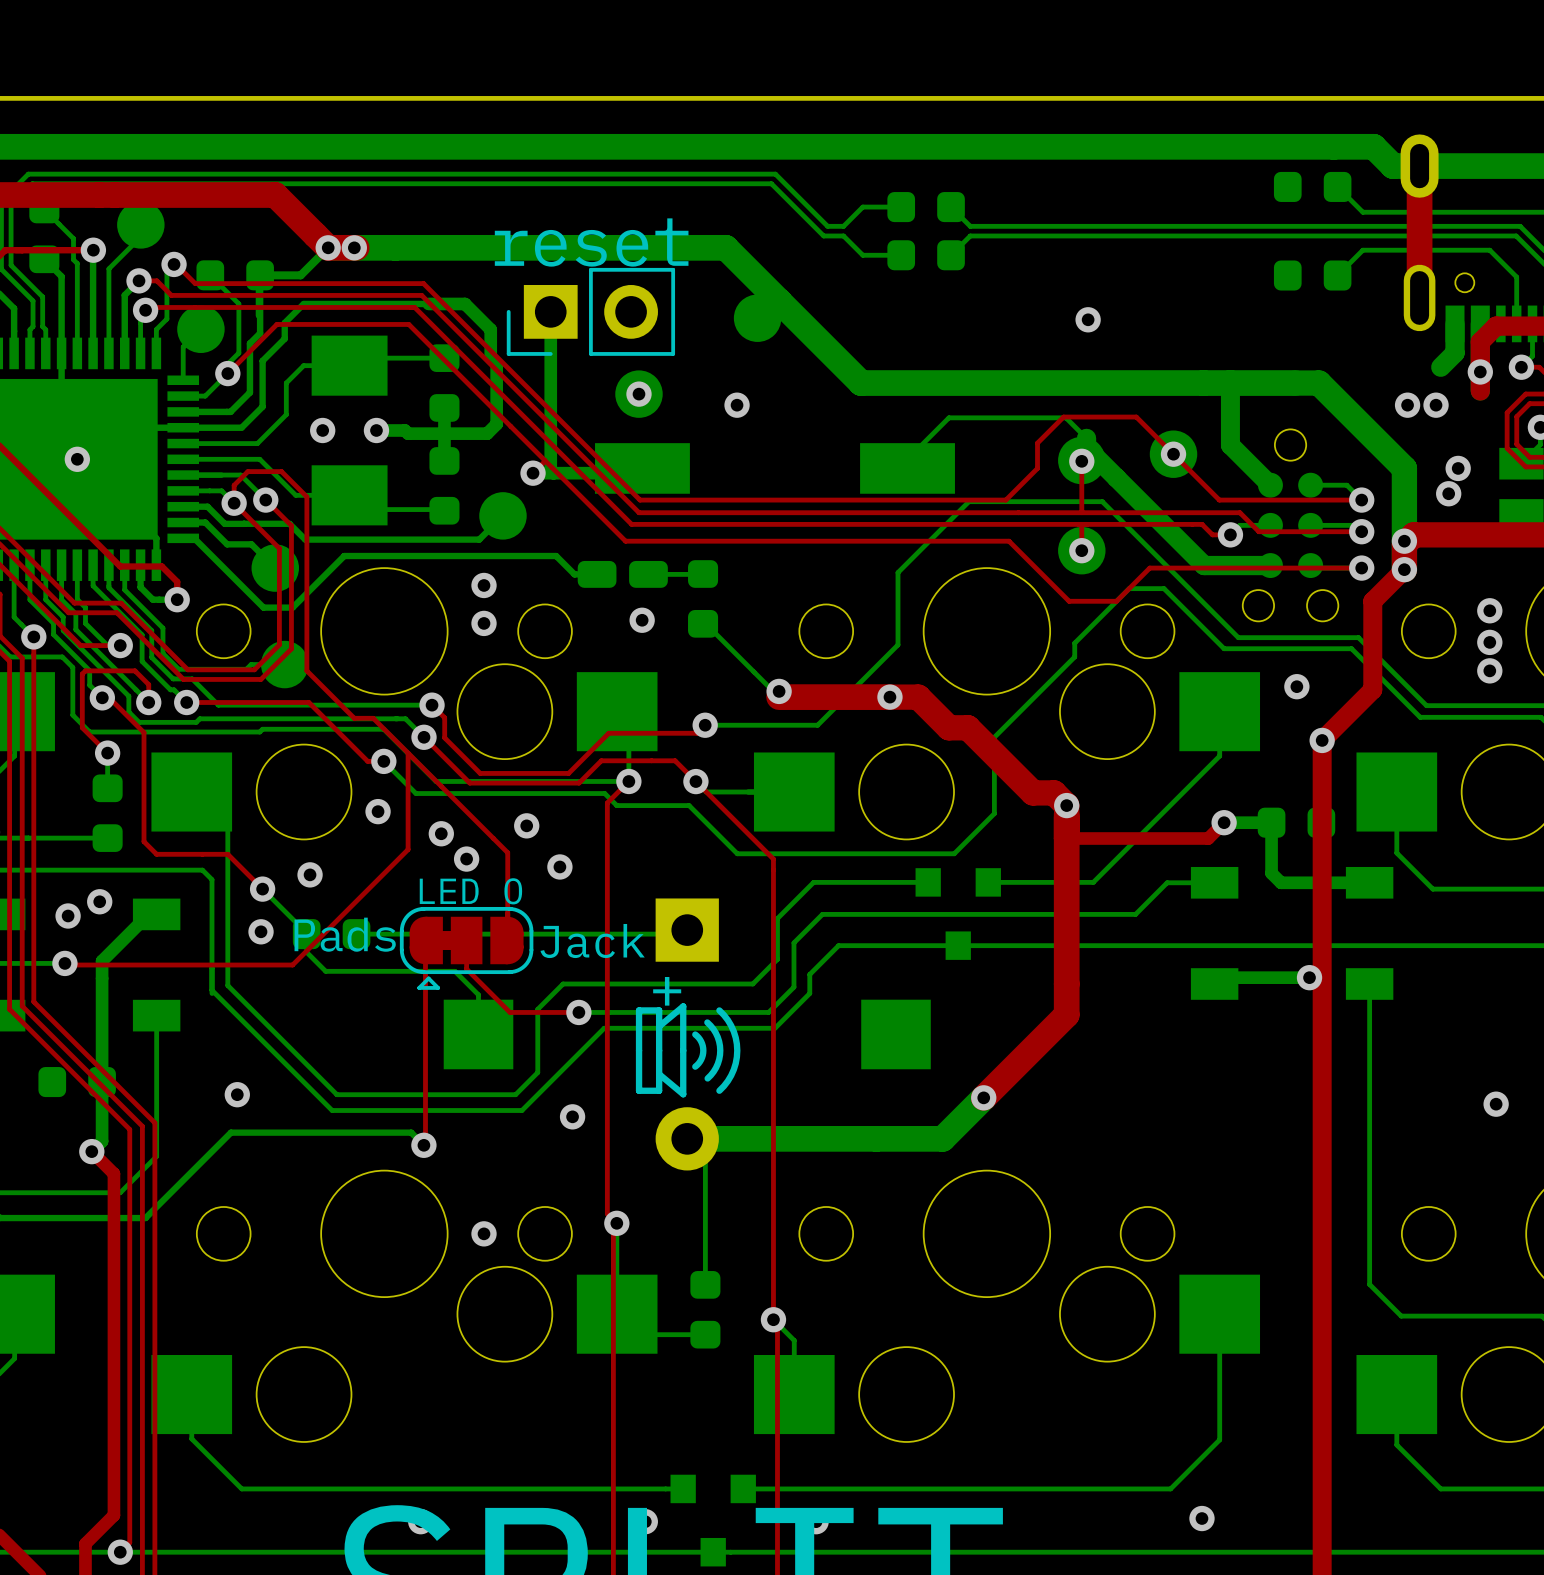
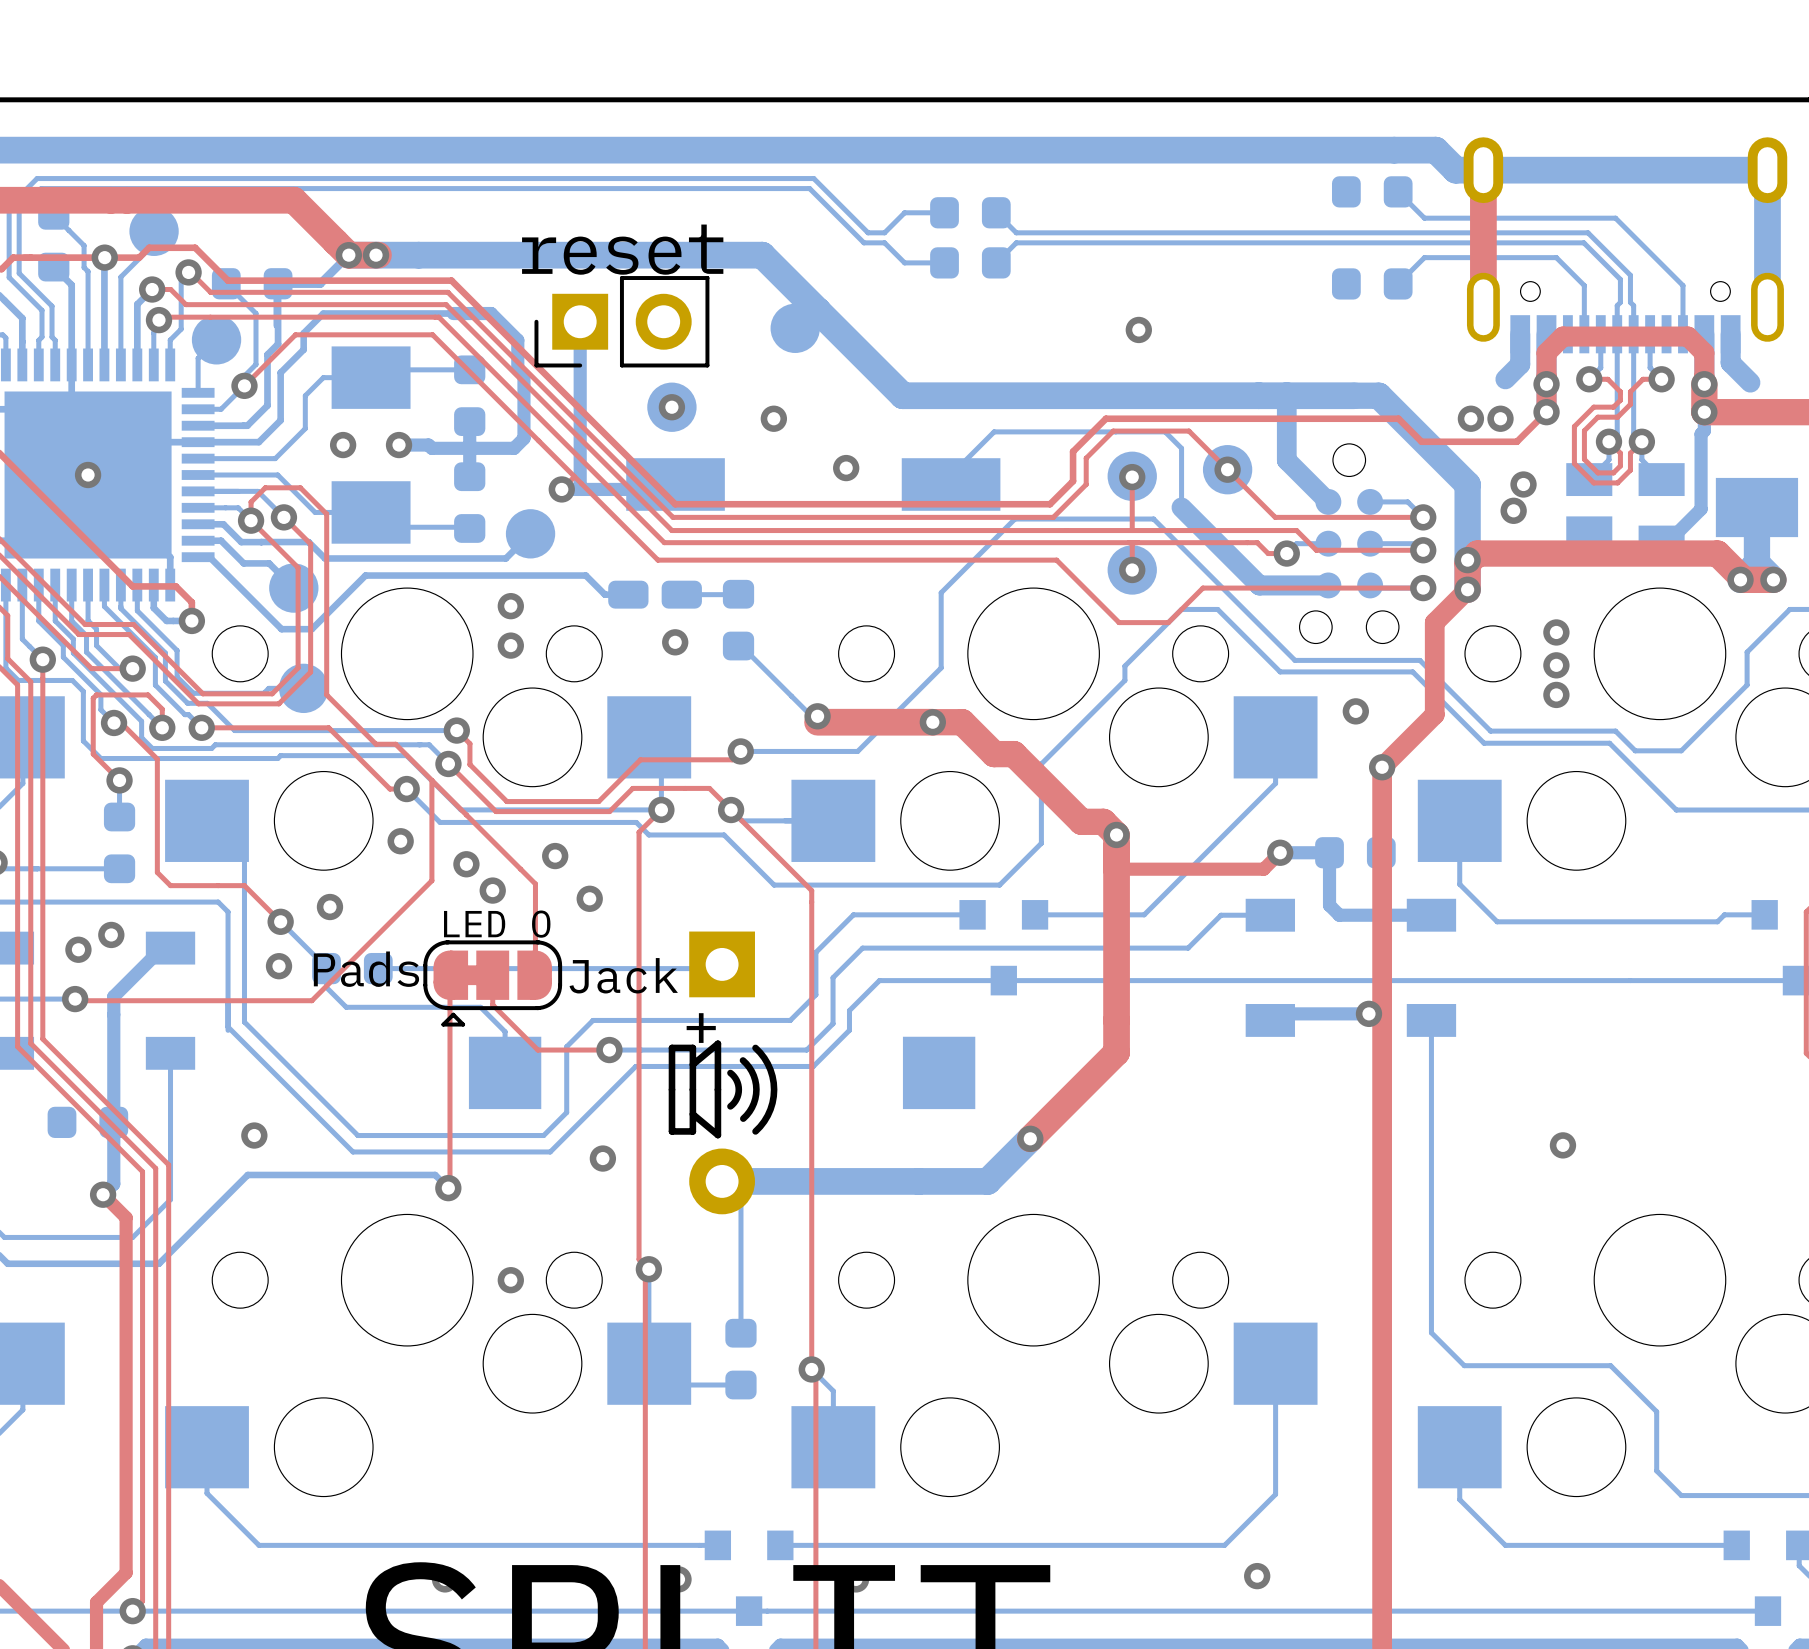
top track: none -> (104, 257) (139, 257) (149, 247) (195, 247) (228, 280) (451, 280) (675, 504) (1050, 504) (1073, 481) (1073, 451) (1105, 418) (1398, 418) (1421, 441) (1516, 441) (1546, 412)
via: none -> (1546, 412)
bottom track: (1065, 417) (1086, 438) (1086, 447) (1129, 490) -> (1115, 431) (1165, 431) (1181, 448) (1181, 507)
via: none -> (846, 468)

